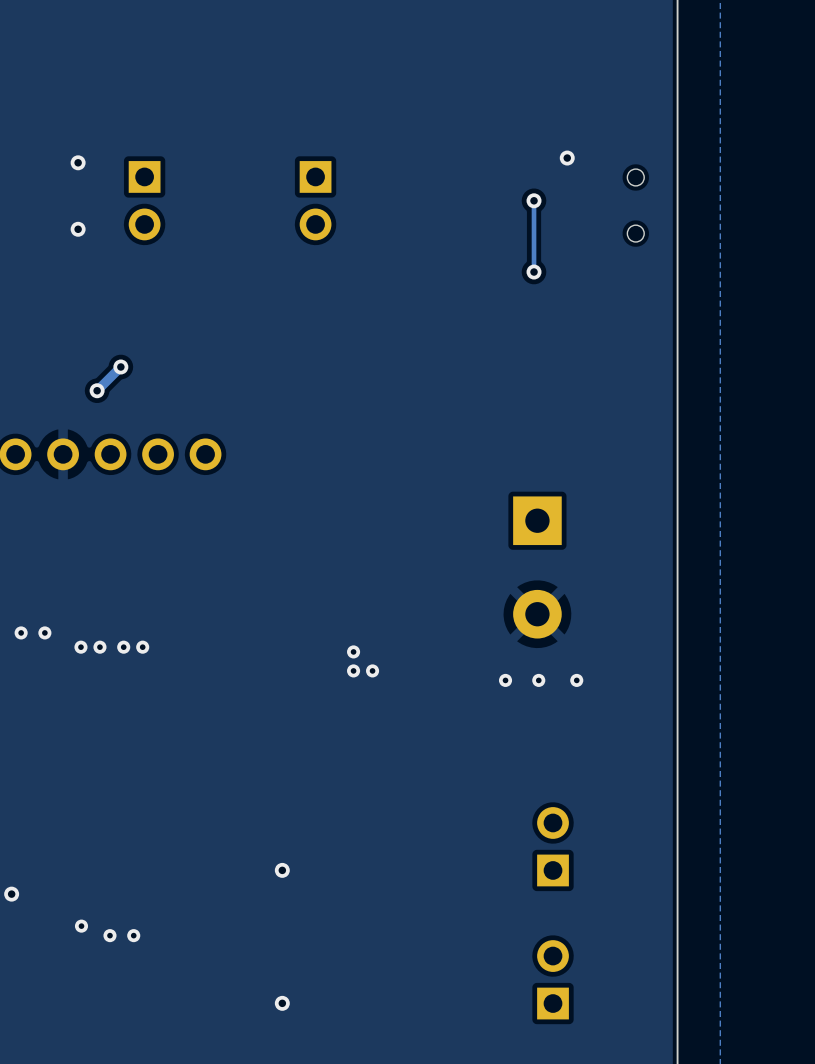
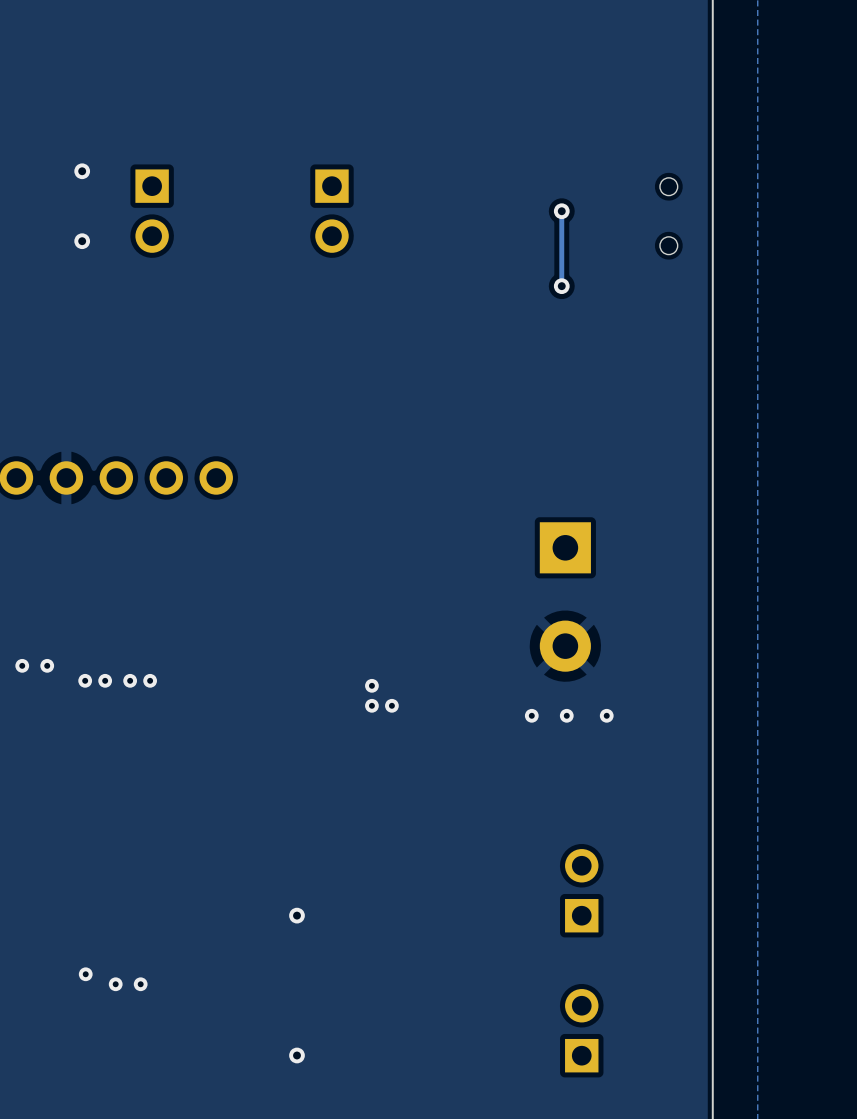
via: (567, 158) -> none
track: (120, 366) (97, 390) -> none
via: (120, 366) -> none
via: (97, 390) -> none
via: (11, 894) -> none

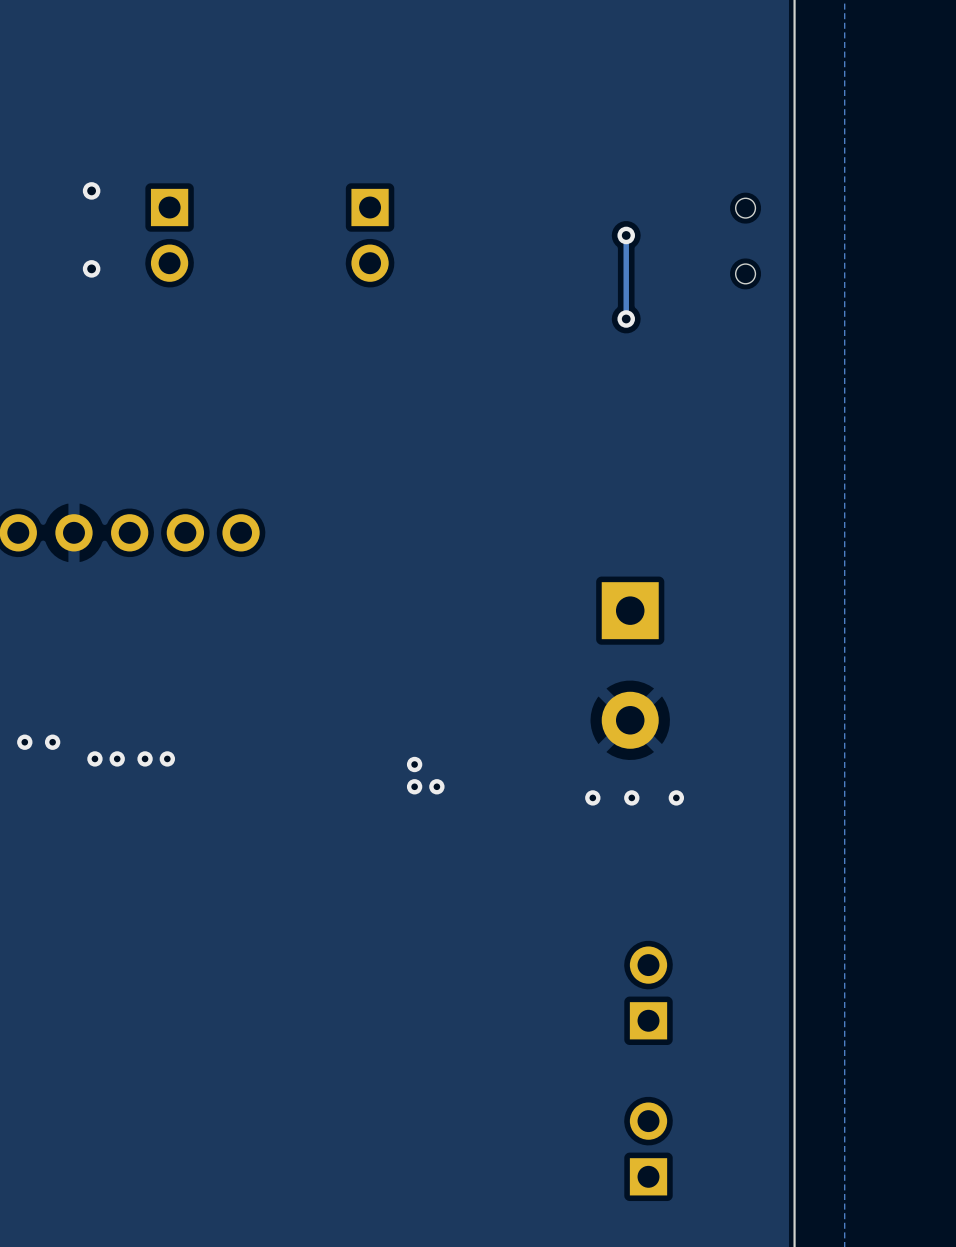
via: (297, 915) -> none
via: (85, 974) -> none
via: (115, 984) -> none
via: (140, 984) -> none
via: (297, 1055) -> none

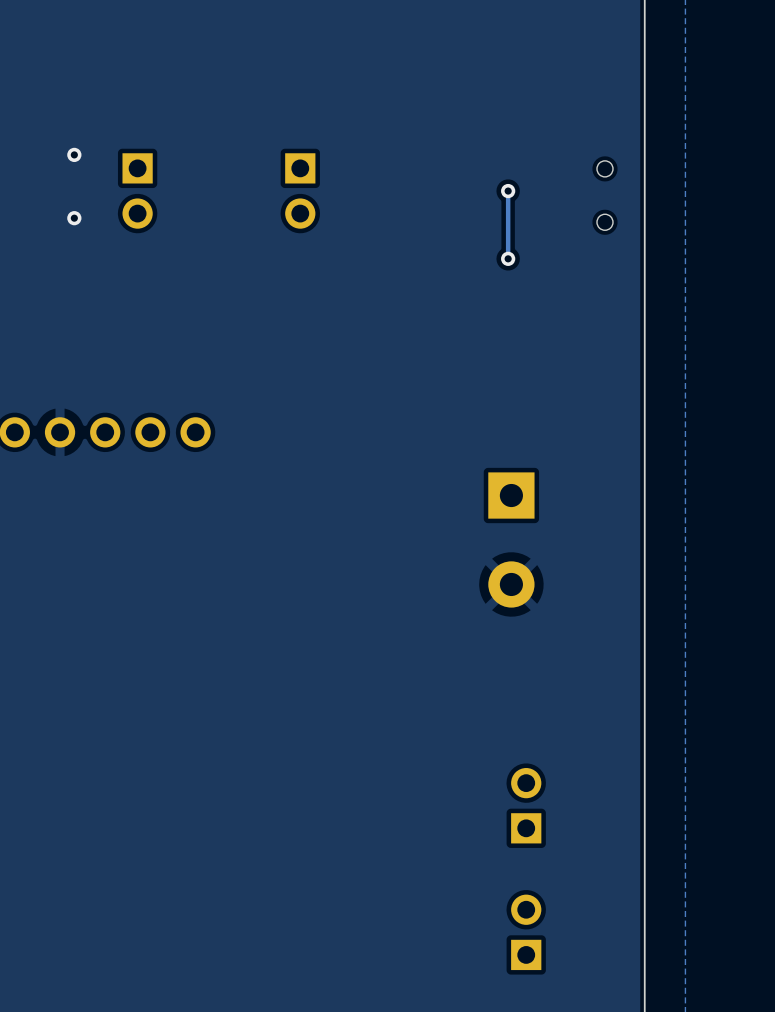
via: (24, 742) -> none
via: (52, 742) -> none
via: (94, 758) -> none
via: (117, 758) -> none
via: (145, 758) -> none
via: (167, 758) -> none
via: (414, 764) -> none
via: (414, 786) -> none
via: (436, 786) -> none
via: (592, 797) -> none
via: (631, 797) -> none
via: (676, 797) -> none

